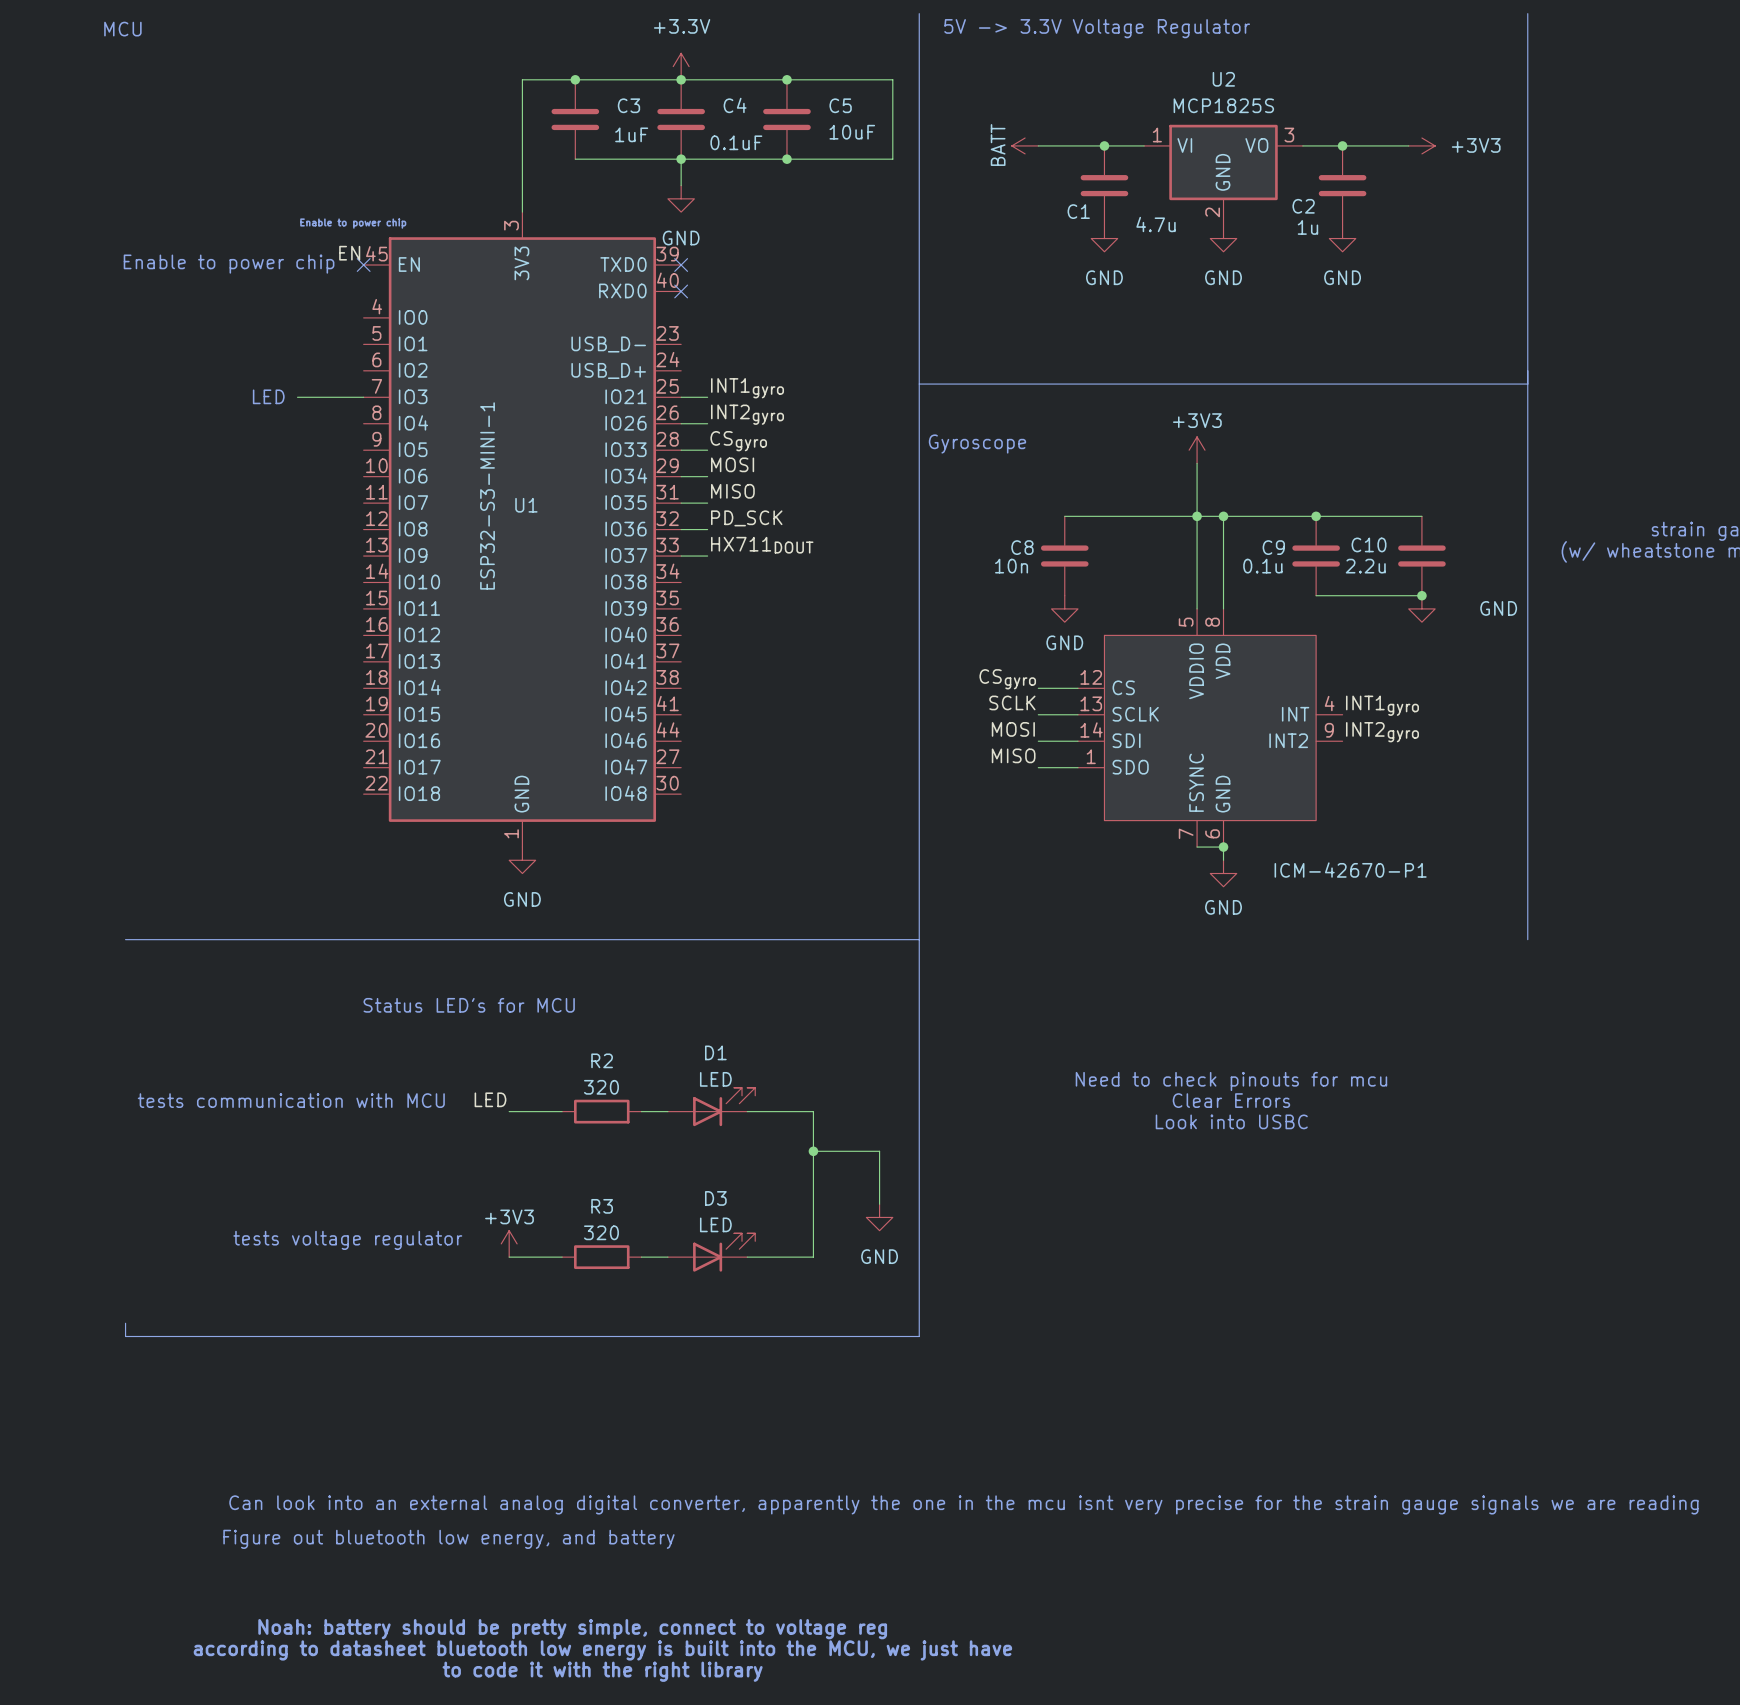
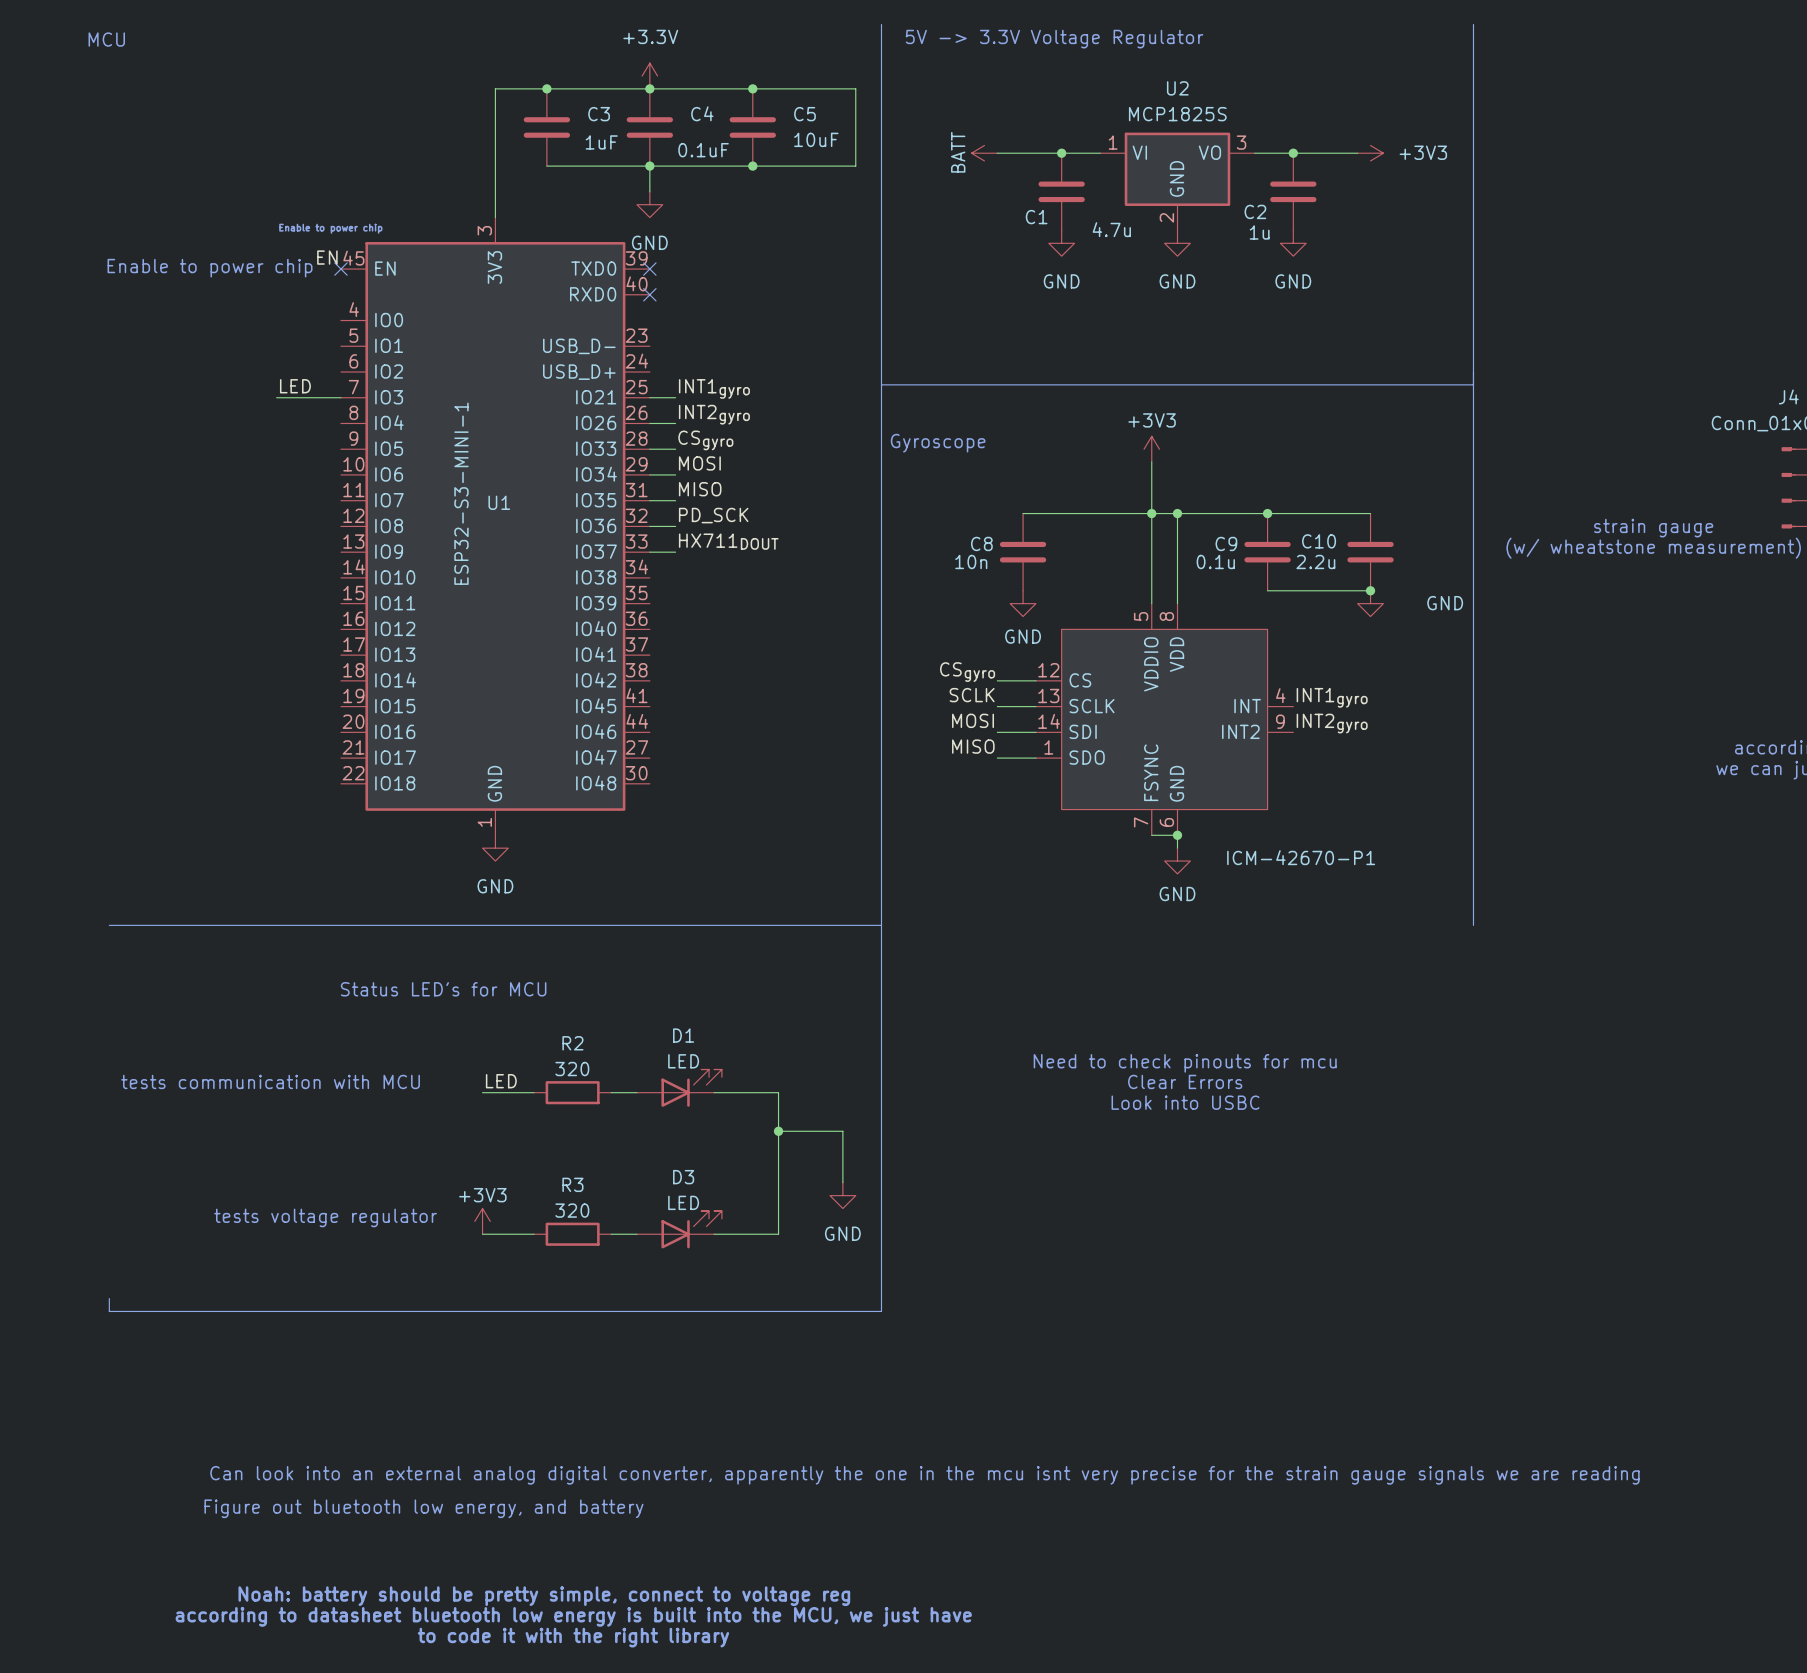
label: none -> LED (295, 386)
text: LED (268, 396) -> none
label position: LED (490, 1099) -> LED (501, 1081)

